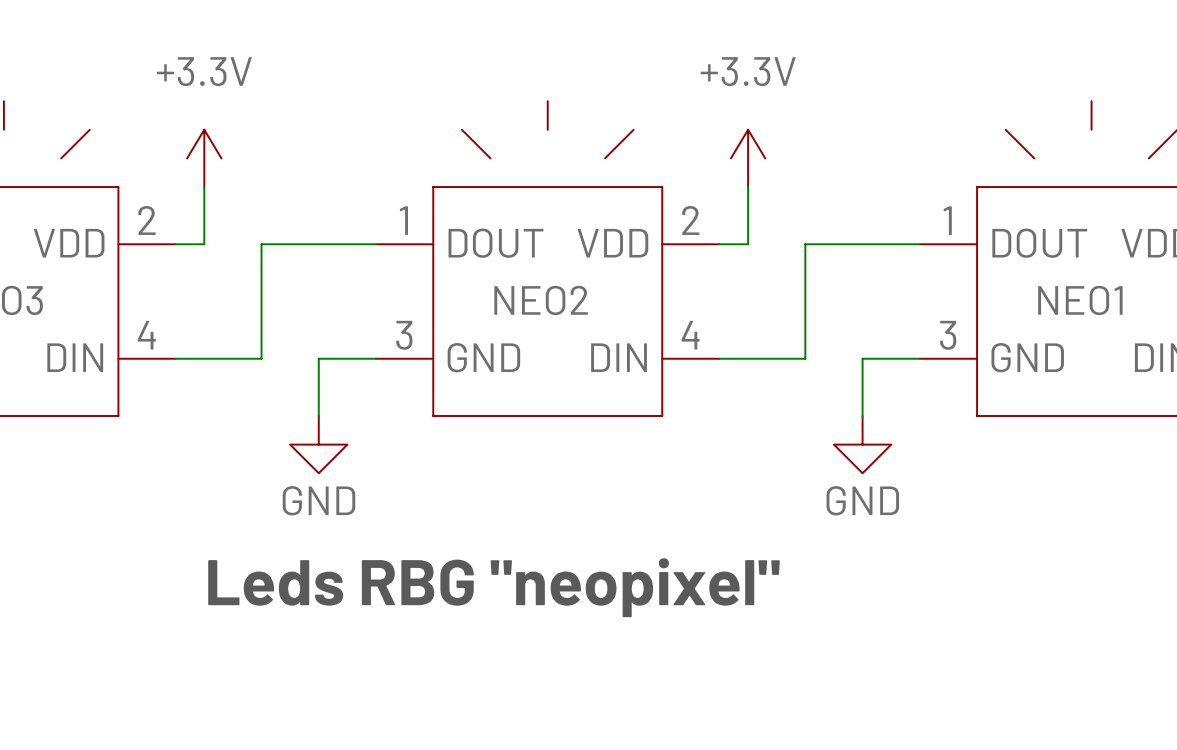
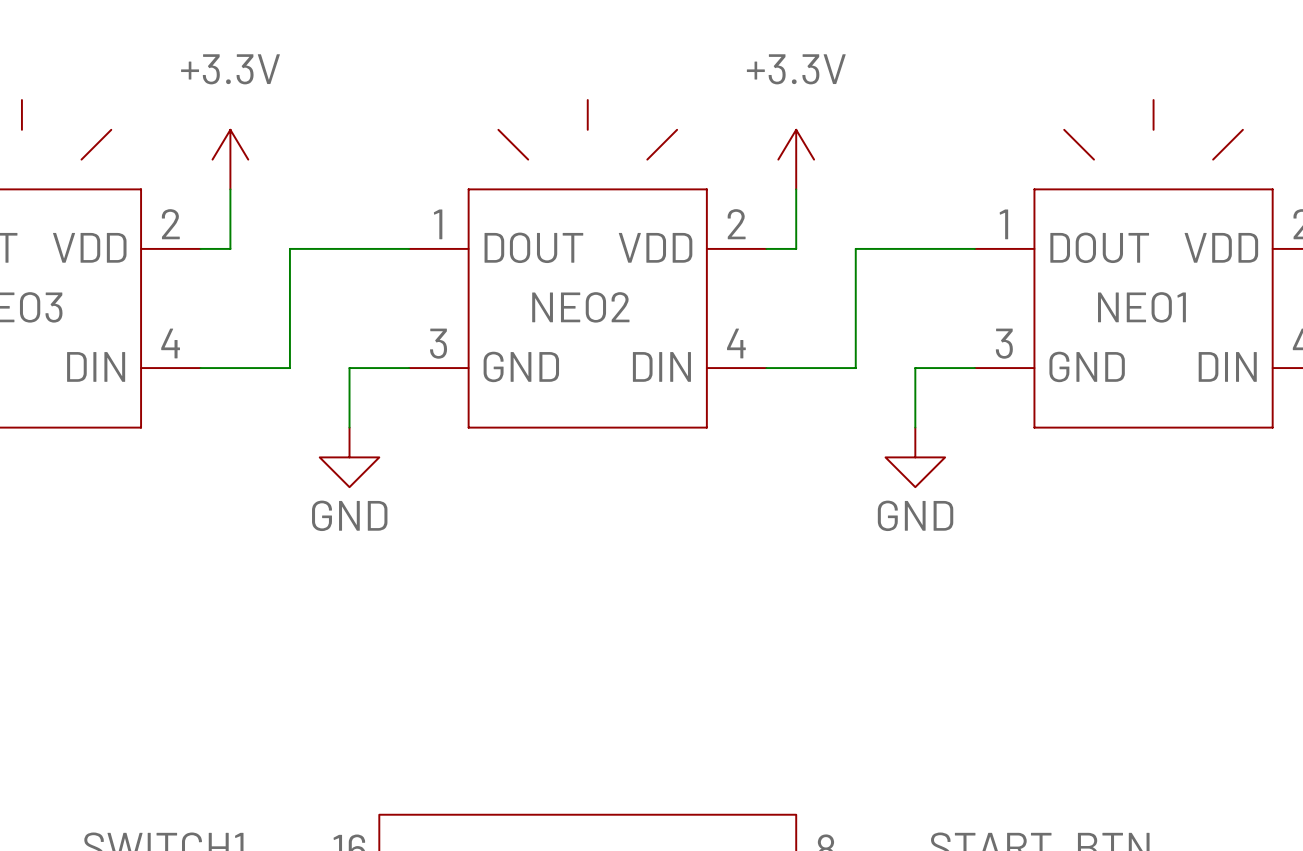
text: Leds RBG "neopixel" (494, 587) -> none

